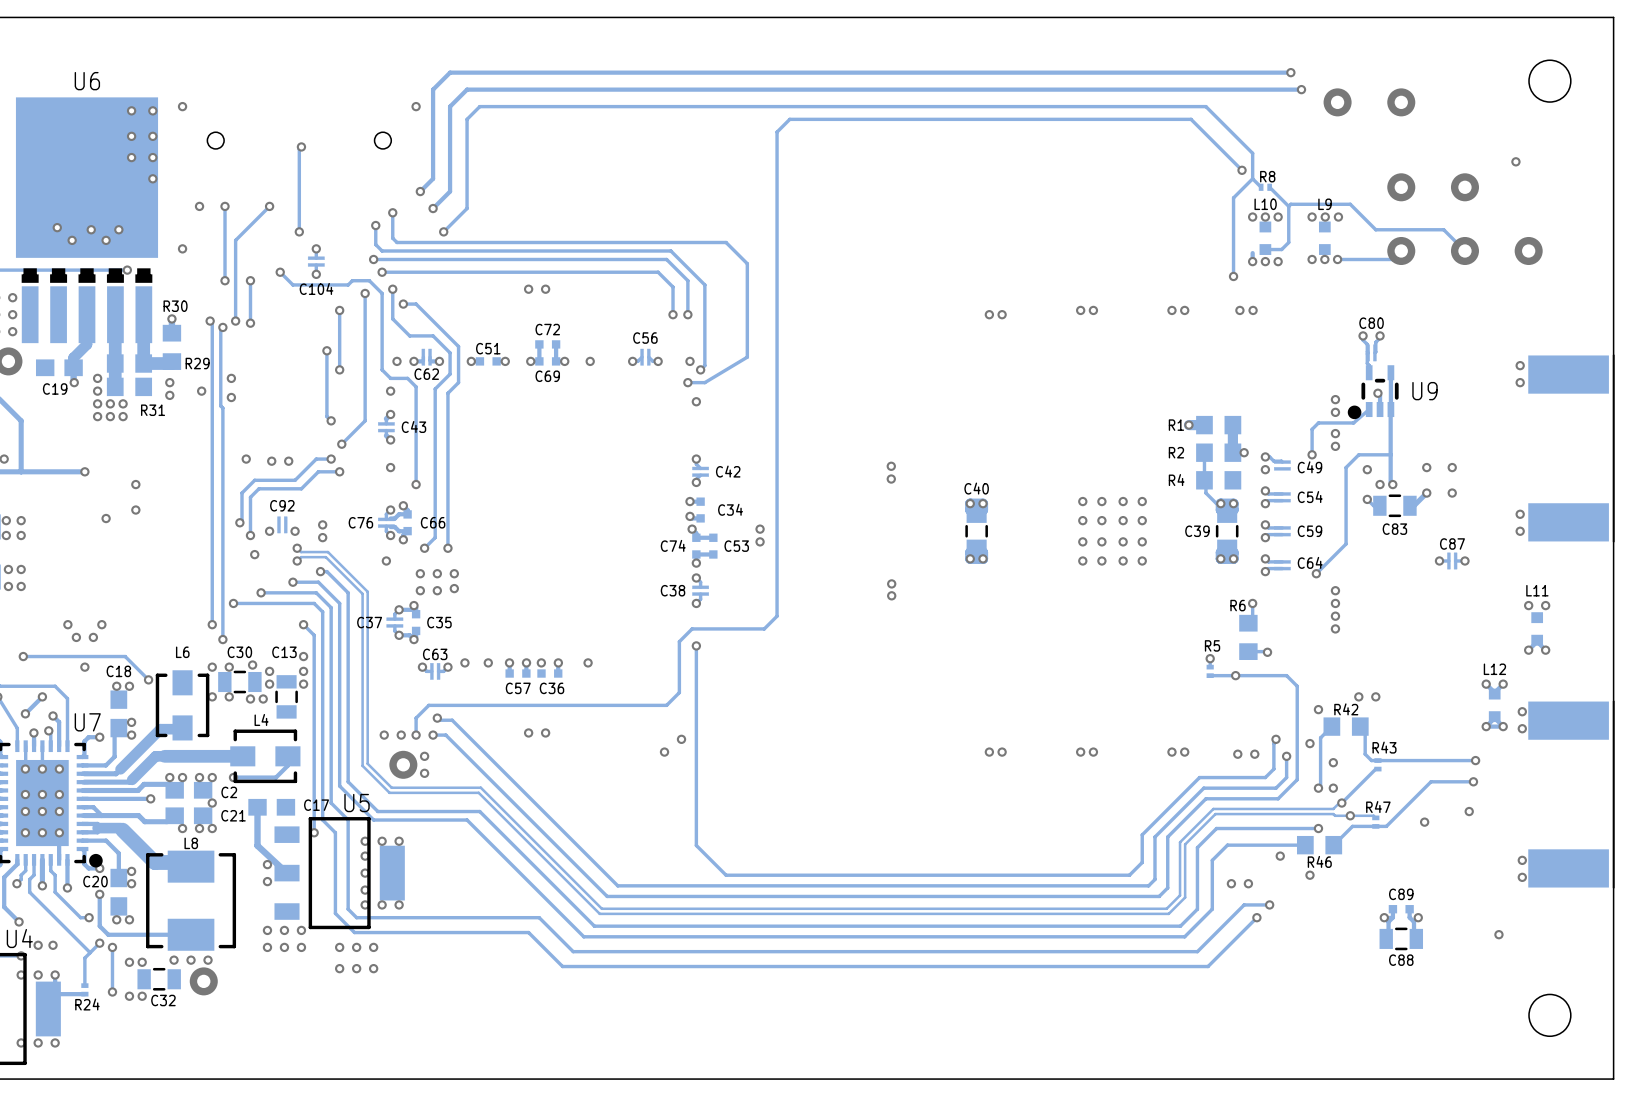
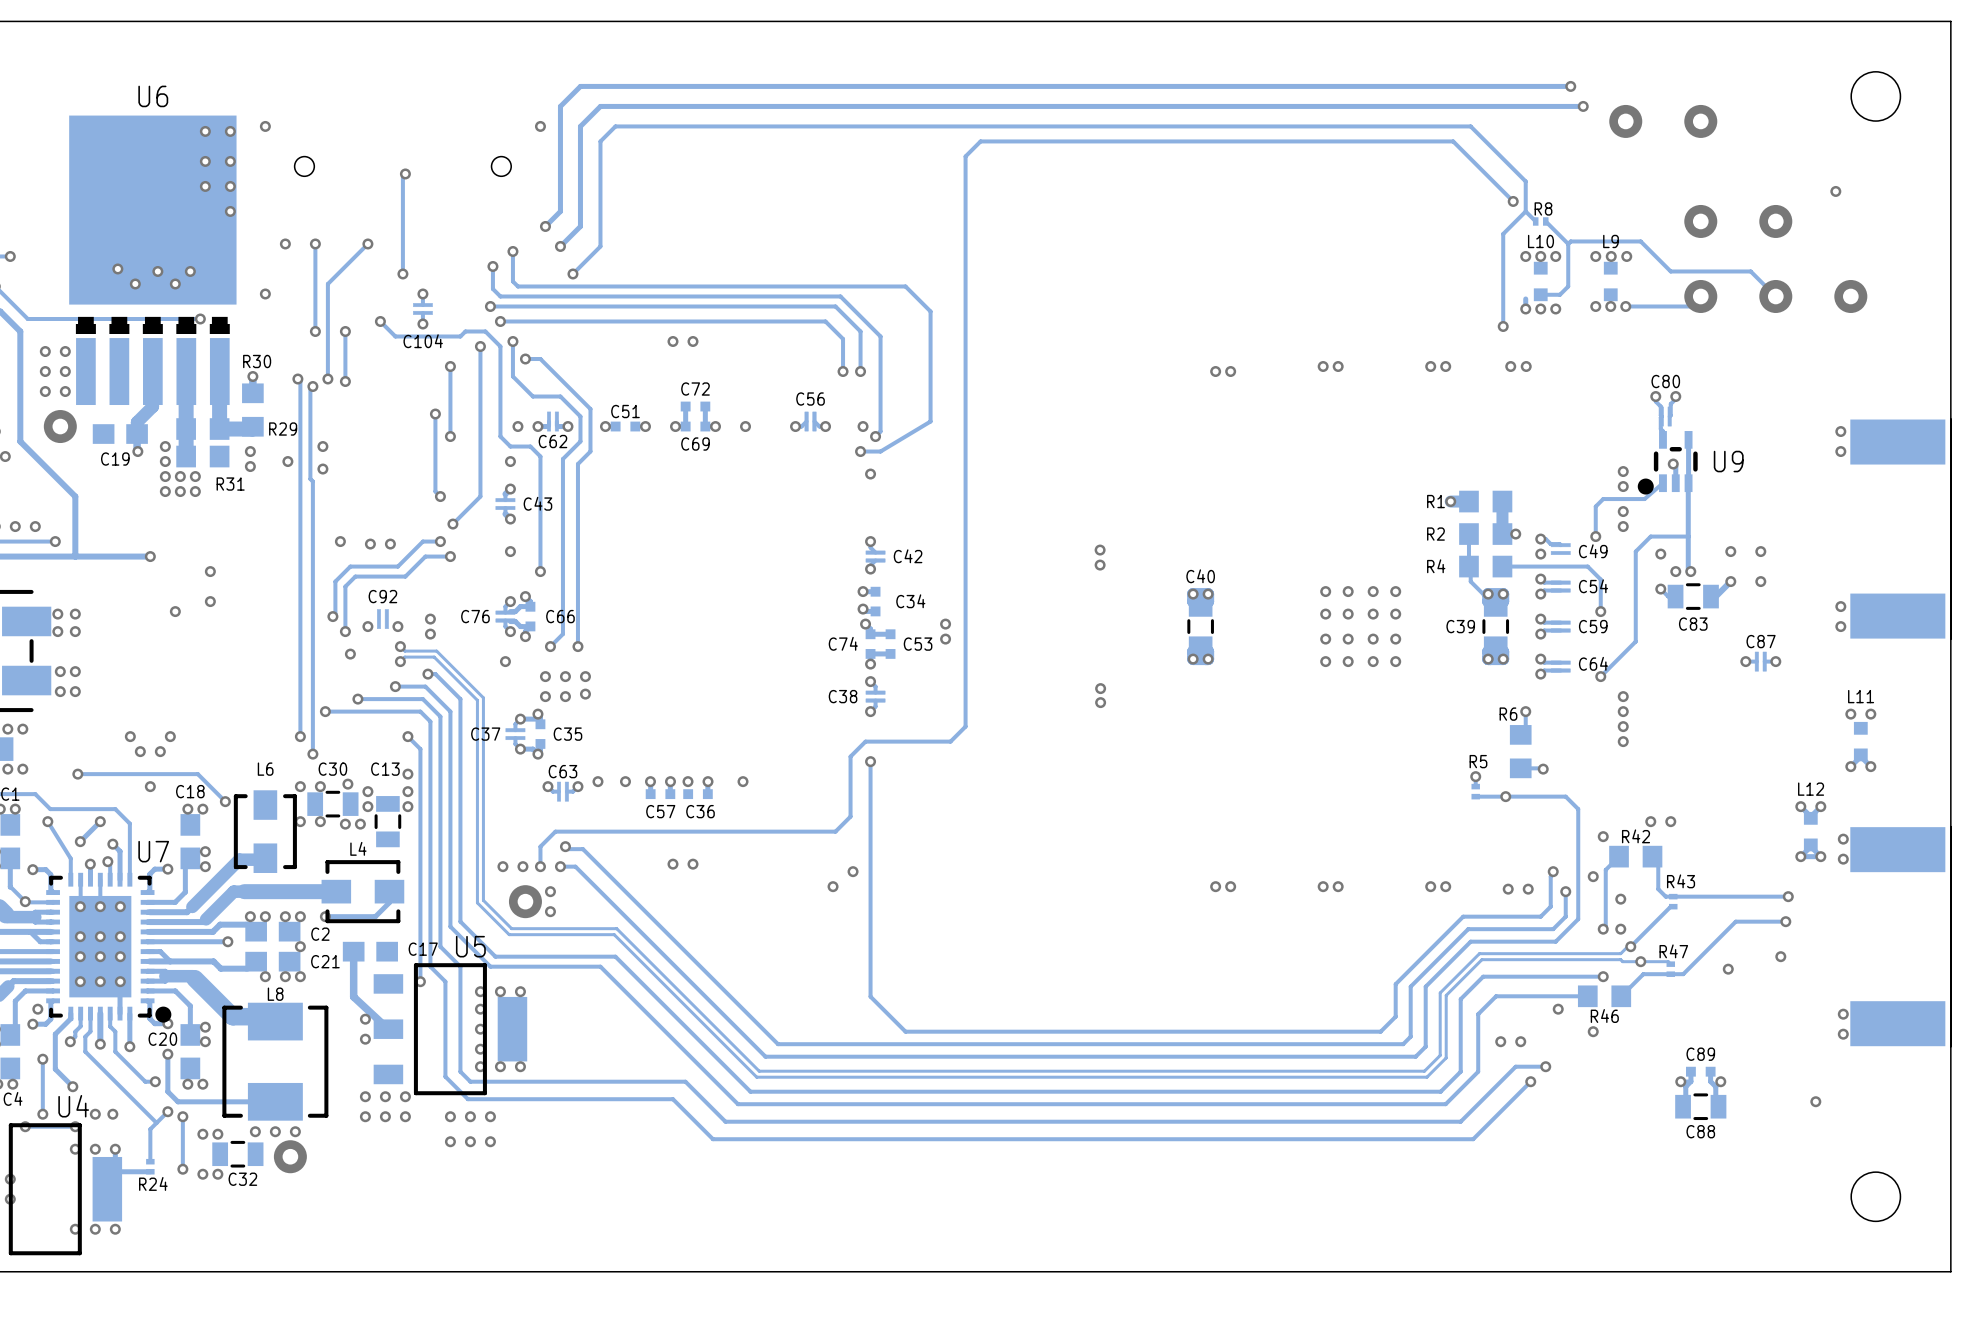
track: none -> (1502, 566) (1587, 566) (1600, 579) (1600, 611)
via: none -> (1600, 611)

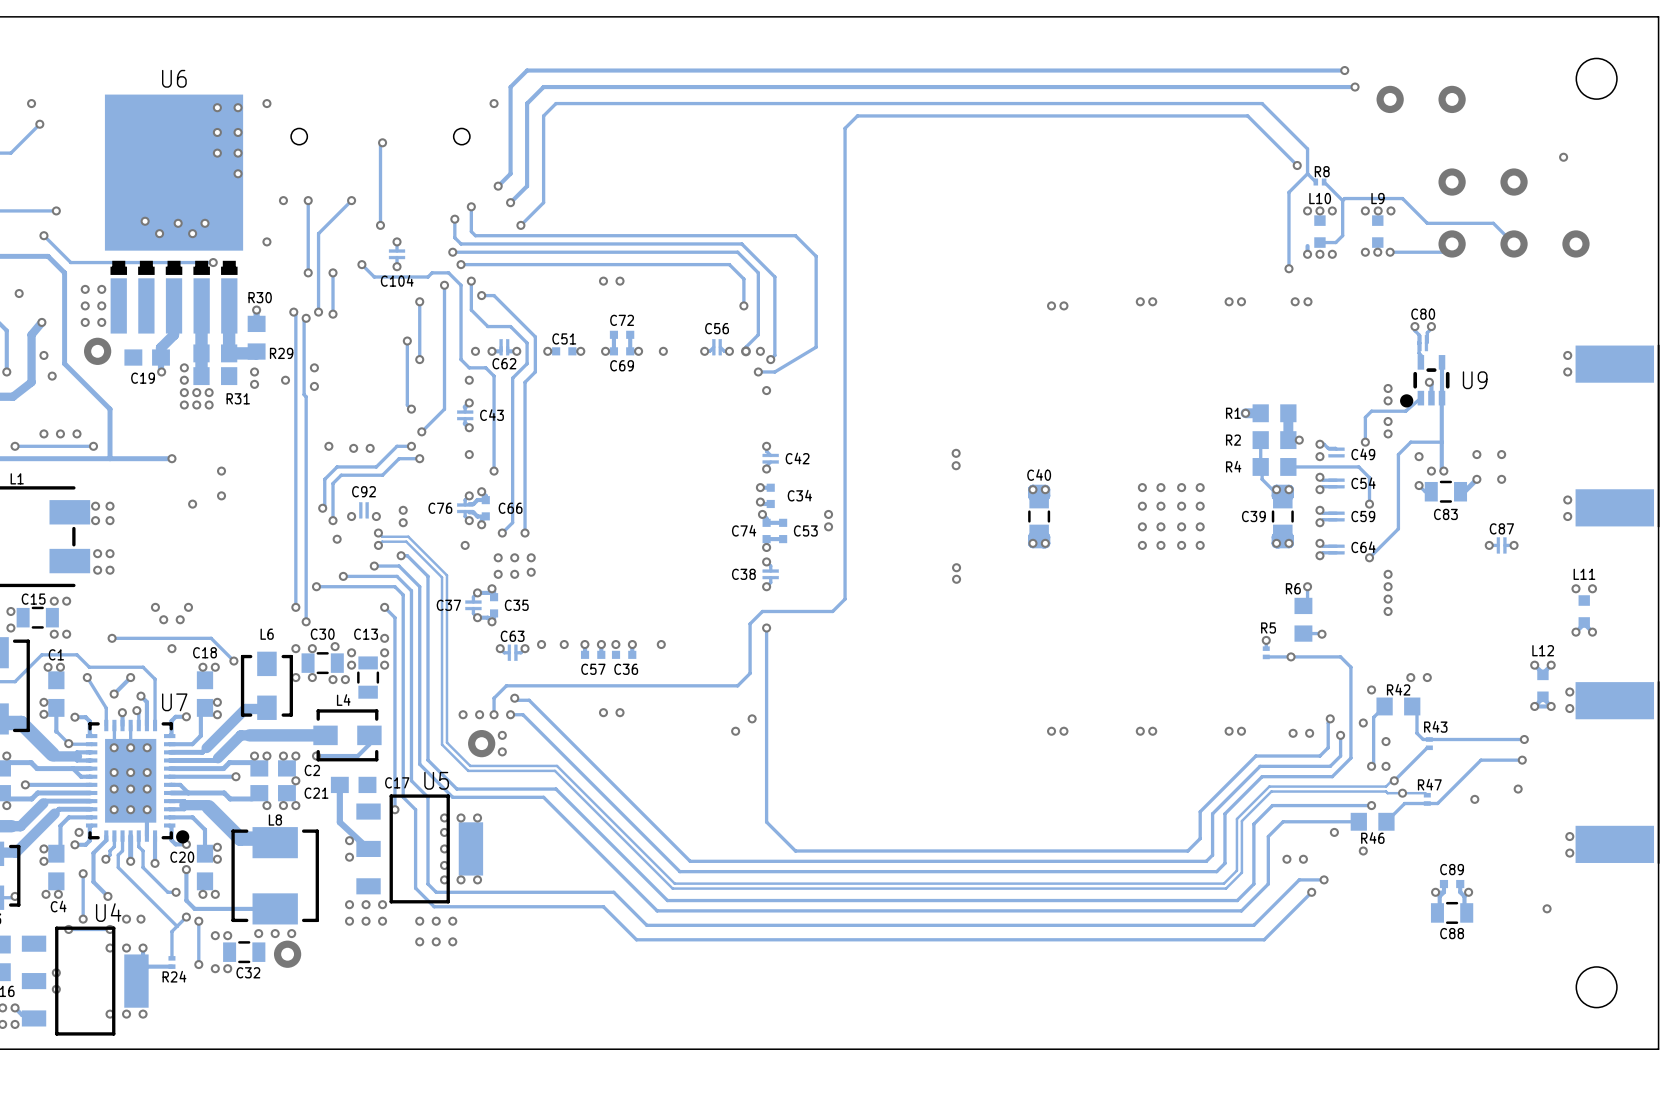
track: none -> (758, 305) (758, 334) (745, 347) (745, 351)
via: (860, 371) -> none
via: none -> (745, 351)

